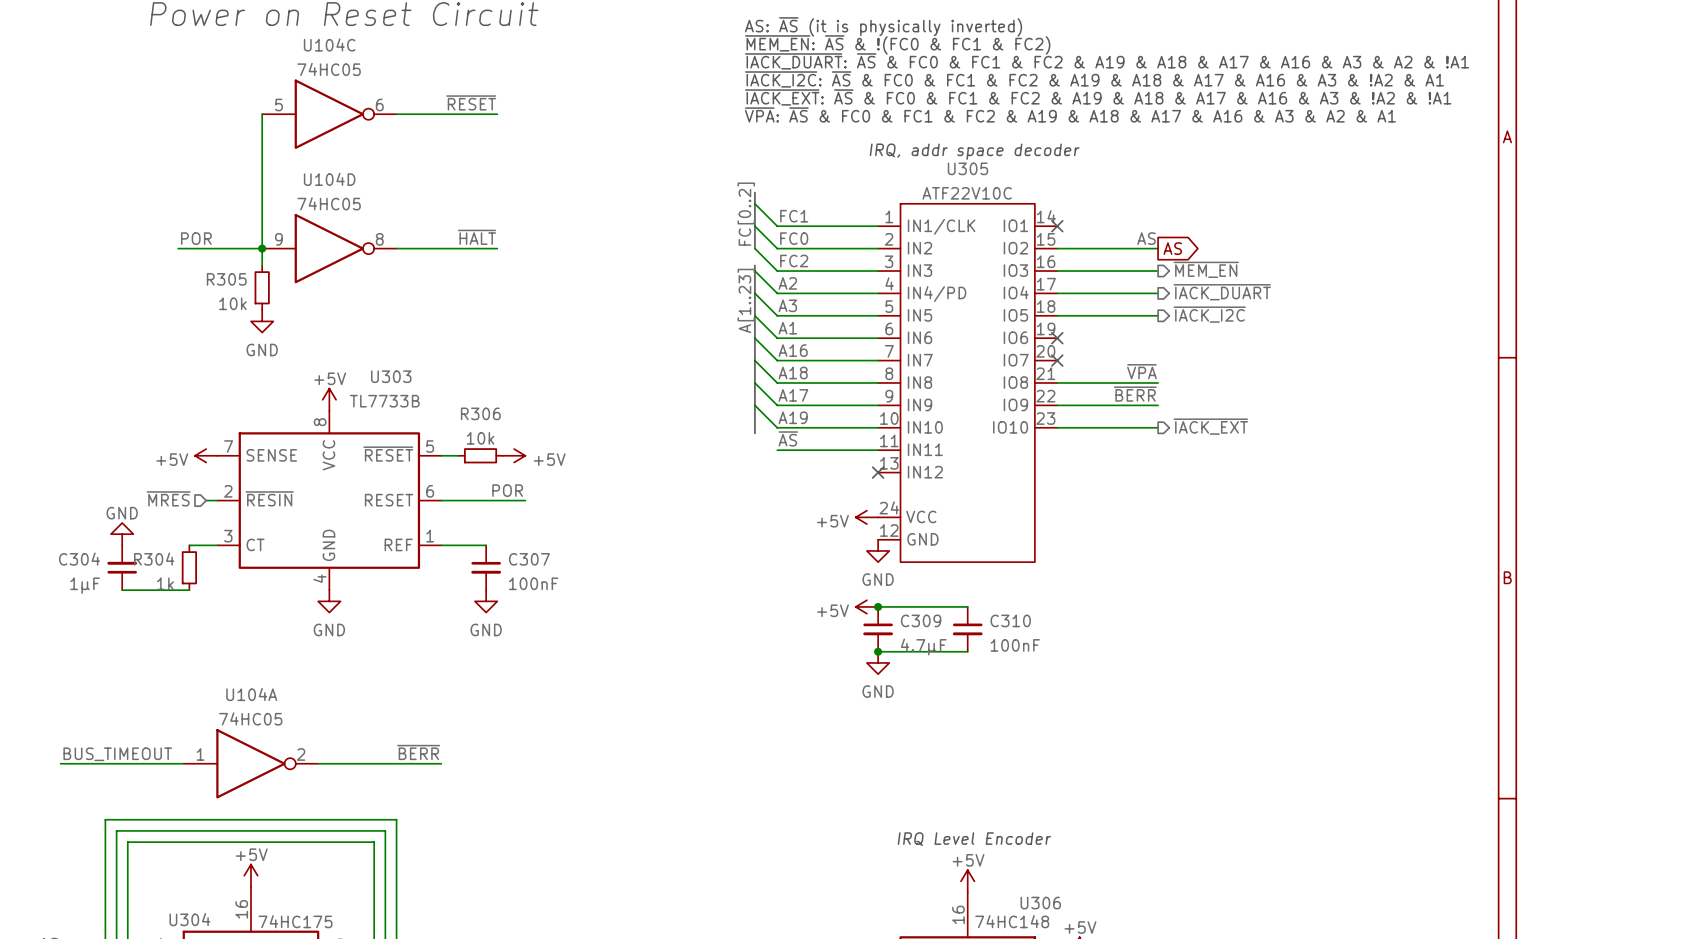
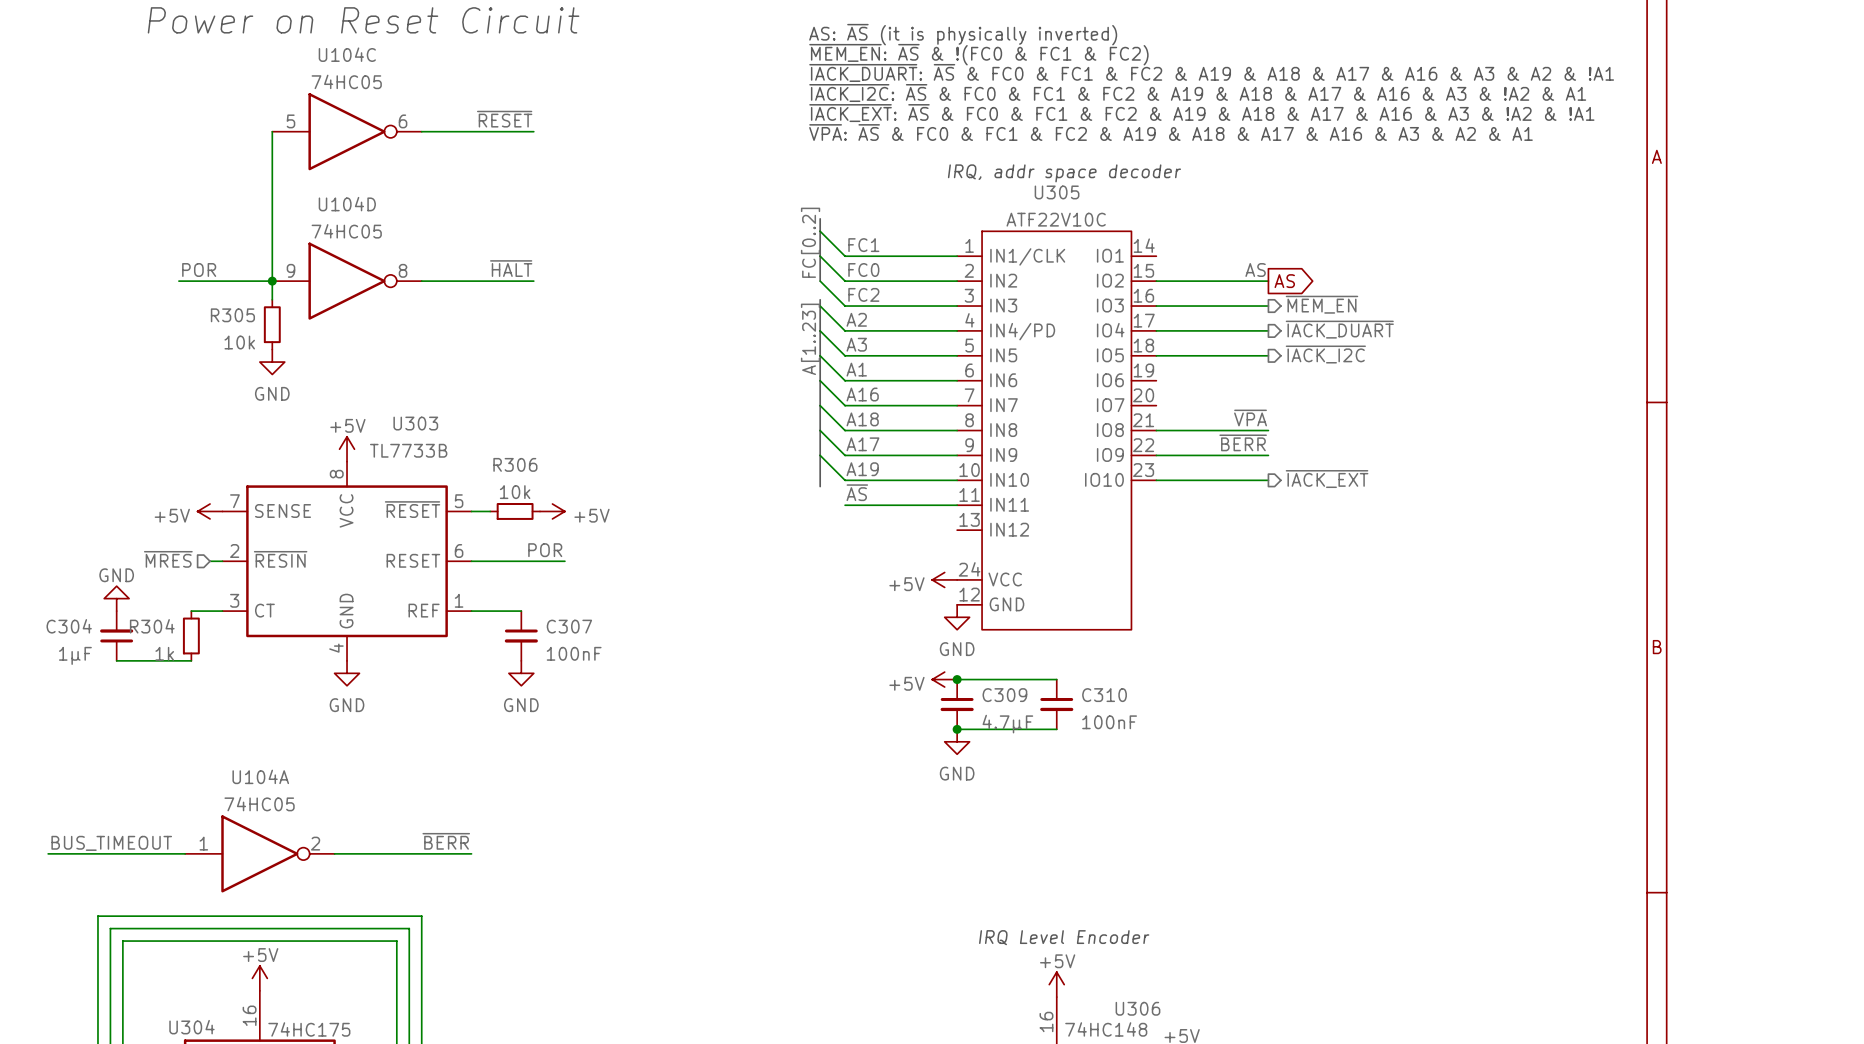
no-connect mark: (1057, 226) -> none
no-connect mark: (1057, 338) -> none
no-connect mark: (1057, 360) -> none
no-connect mark: (878, 472) -> none

